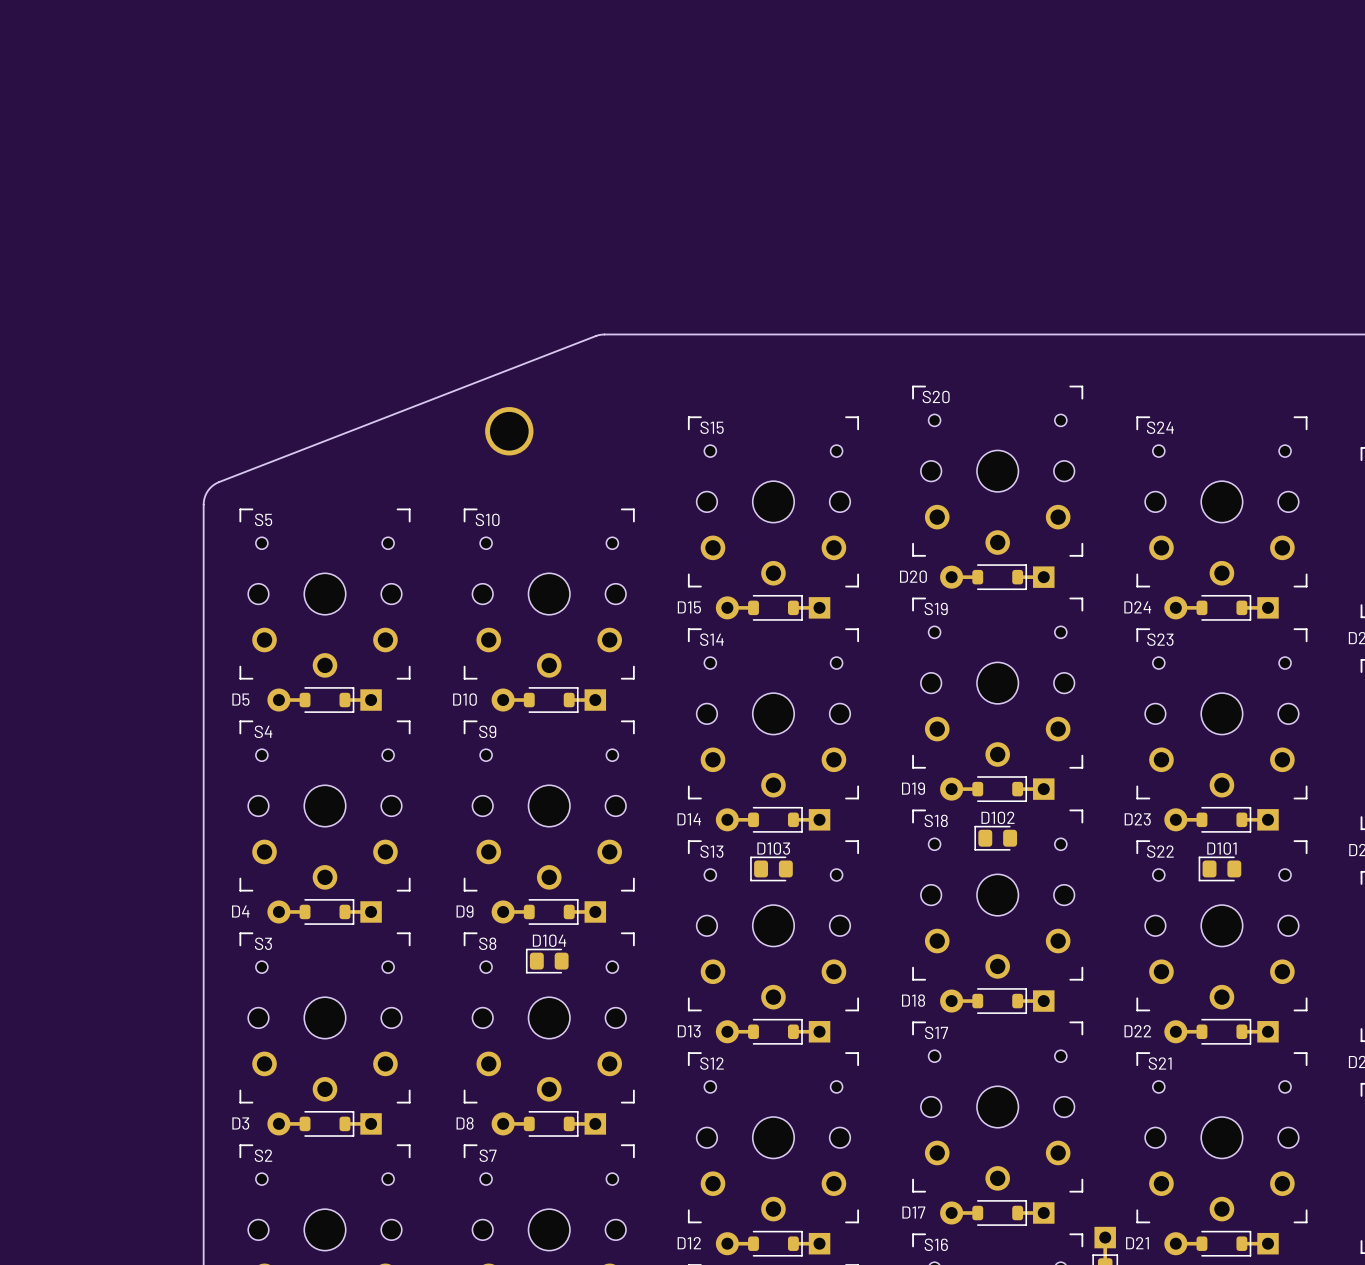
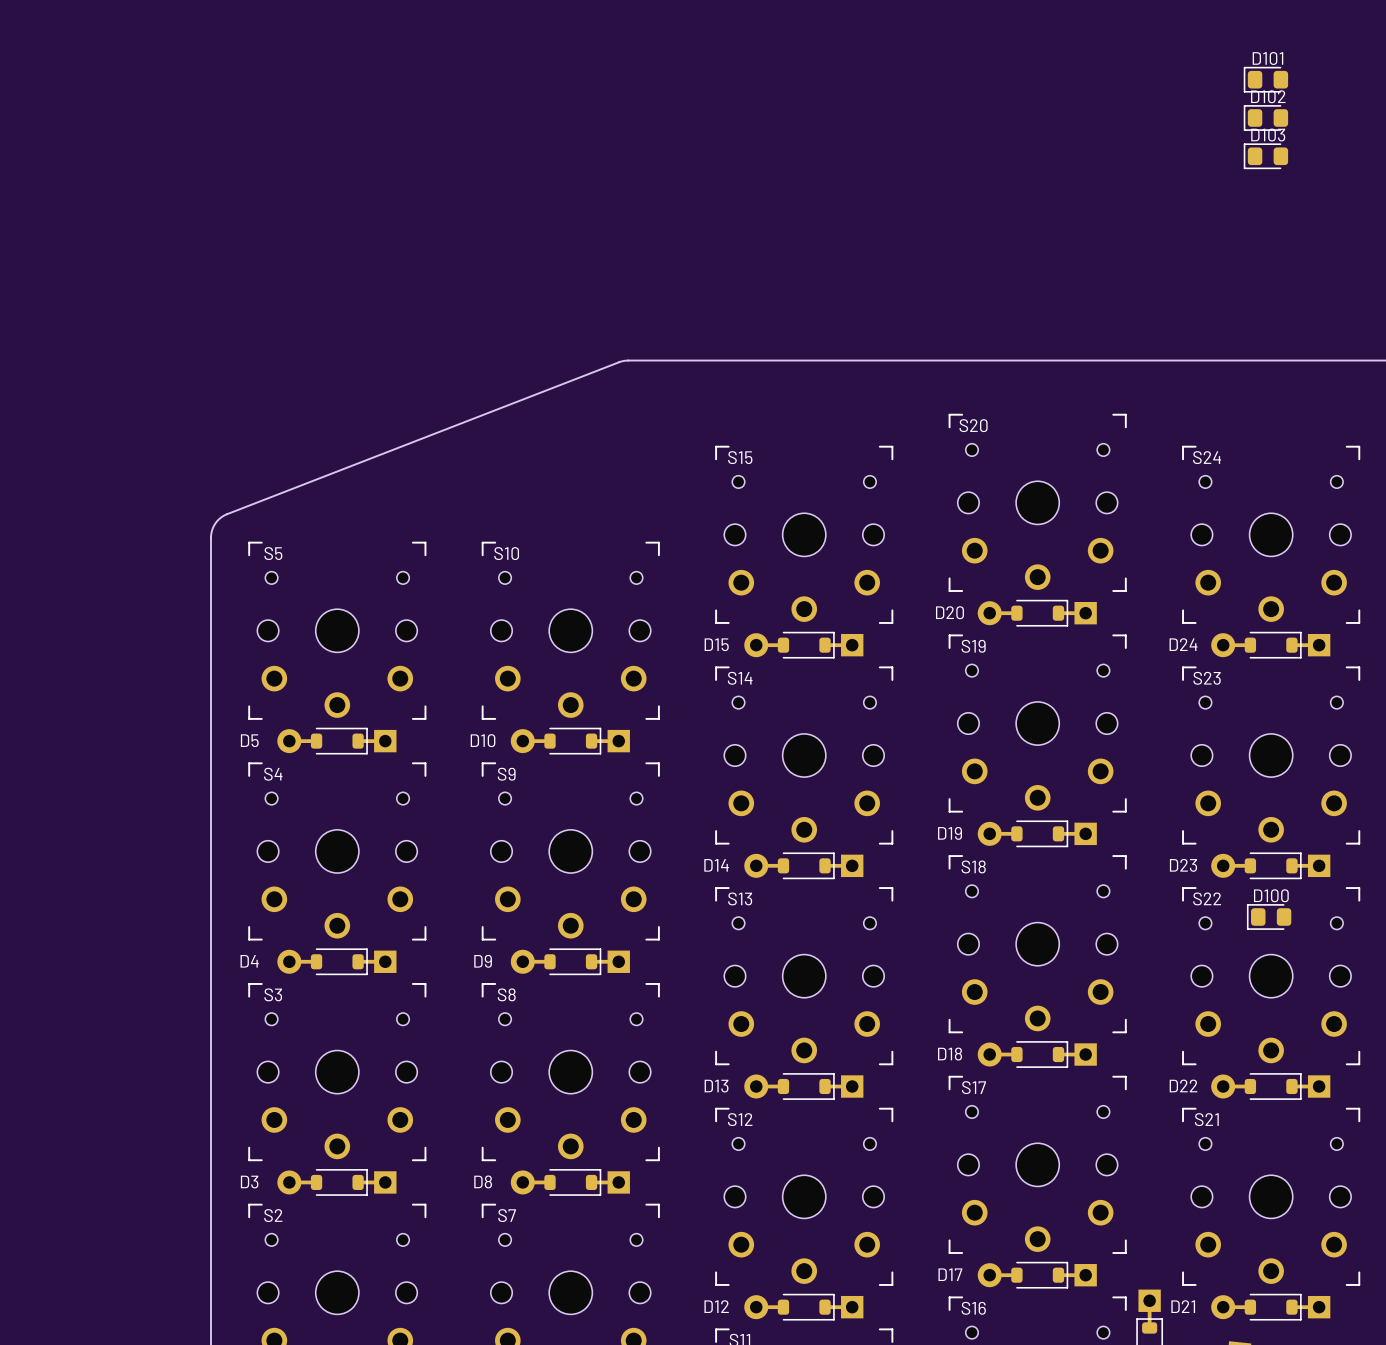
D101: none -> (1265, 79)
part: (509, 431) -> none
D102 position: (995, 838) -> (1265, 117)
D101 name: D101 (1221, 848) -> D100 (1271, 895)
D103 position: (771, 868) -> (1265, 156)
D104: (547, 961) -> none

